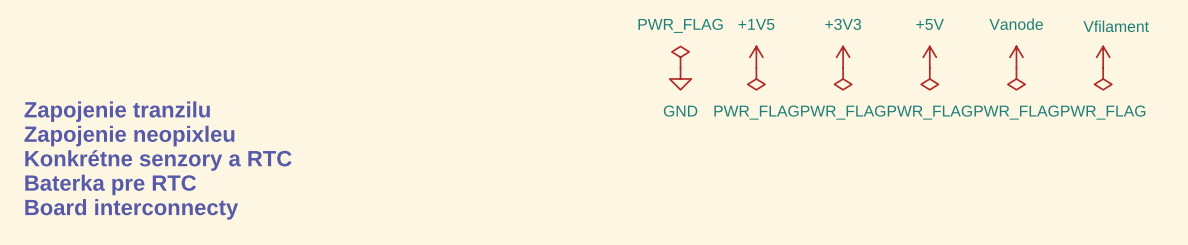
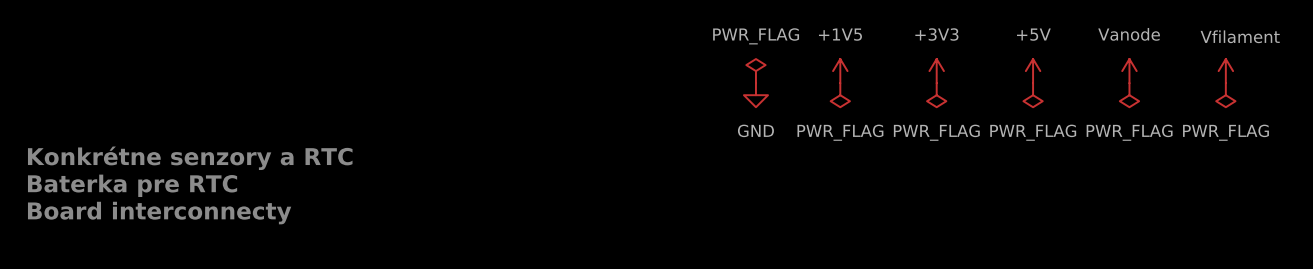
text: Zapojenie tranzilu (117, 111) -> none
text: Zapojenie neopixleu (129, 136) -> Konkrétne senzory a RTC (190, 158)
text: Konkrétne senzory a RTC (158, 160) -> Baterka pre RTC (132, 185)
text: Baterka pre RTC (110, 184) -> Board interconnecty (159, 213)
text: Board interconnecty (131, 209) -> none

